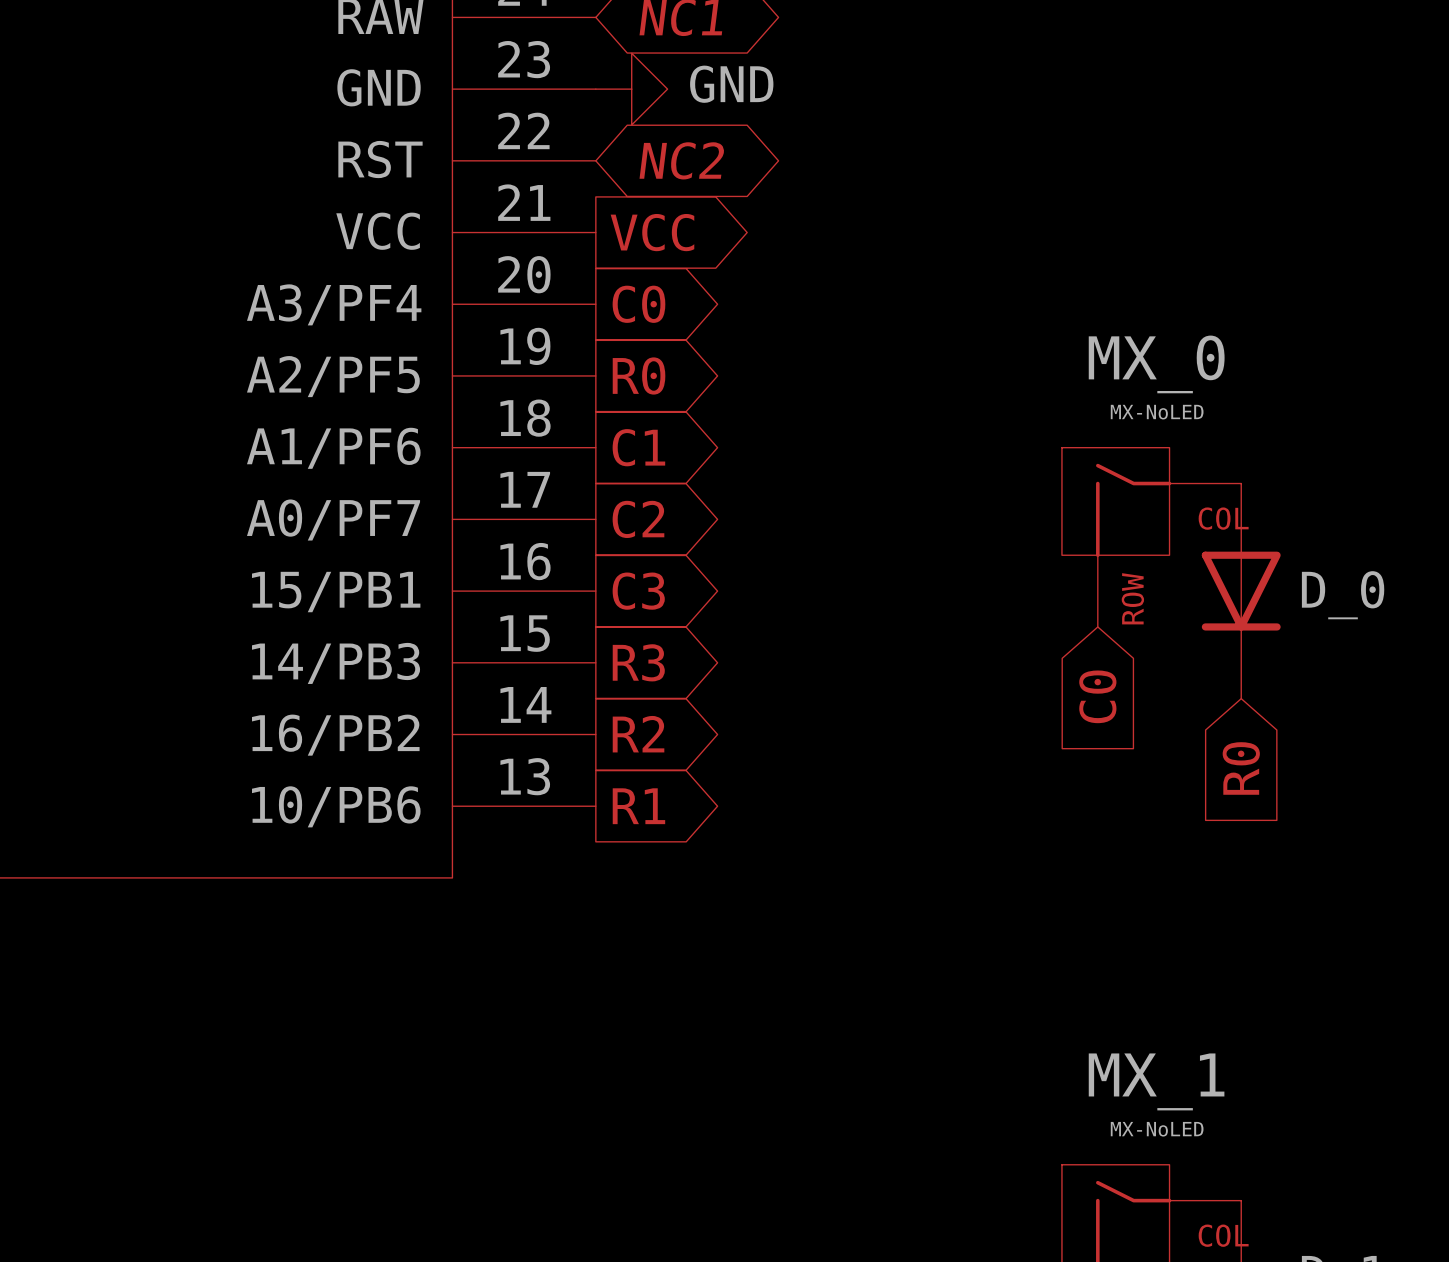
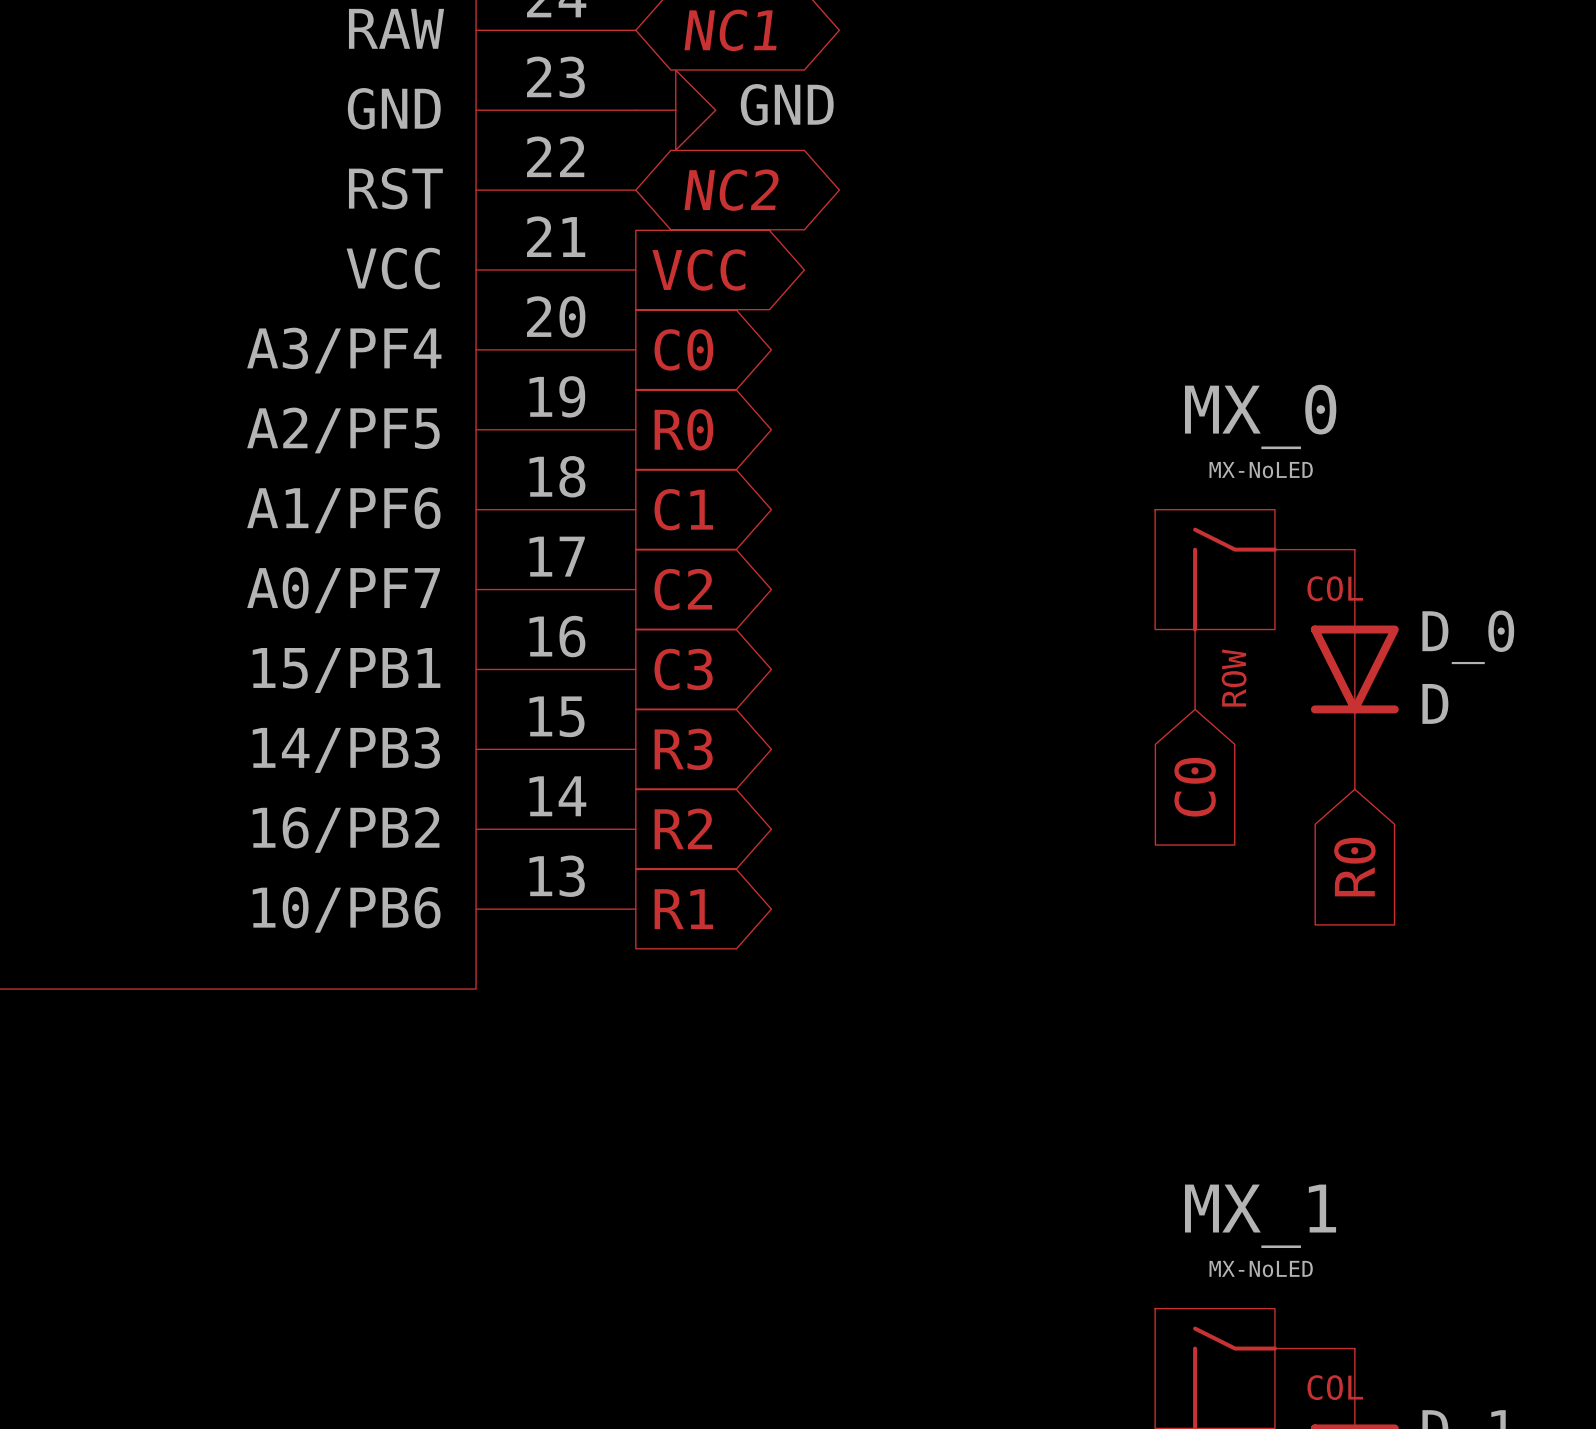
D_0 name position: D_0 (1343, 595) -> D_0 (1468, 637)
D_0 value: none -> D (1435, 703)

